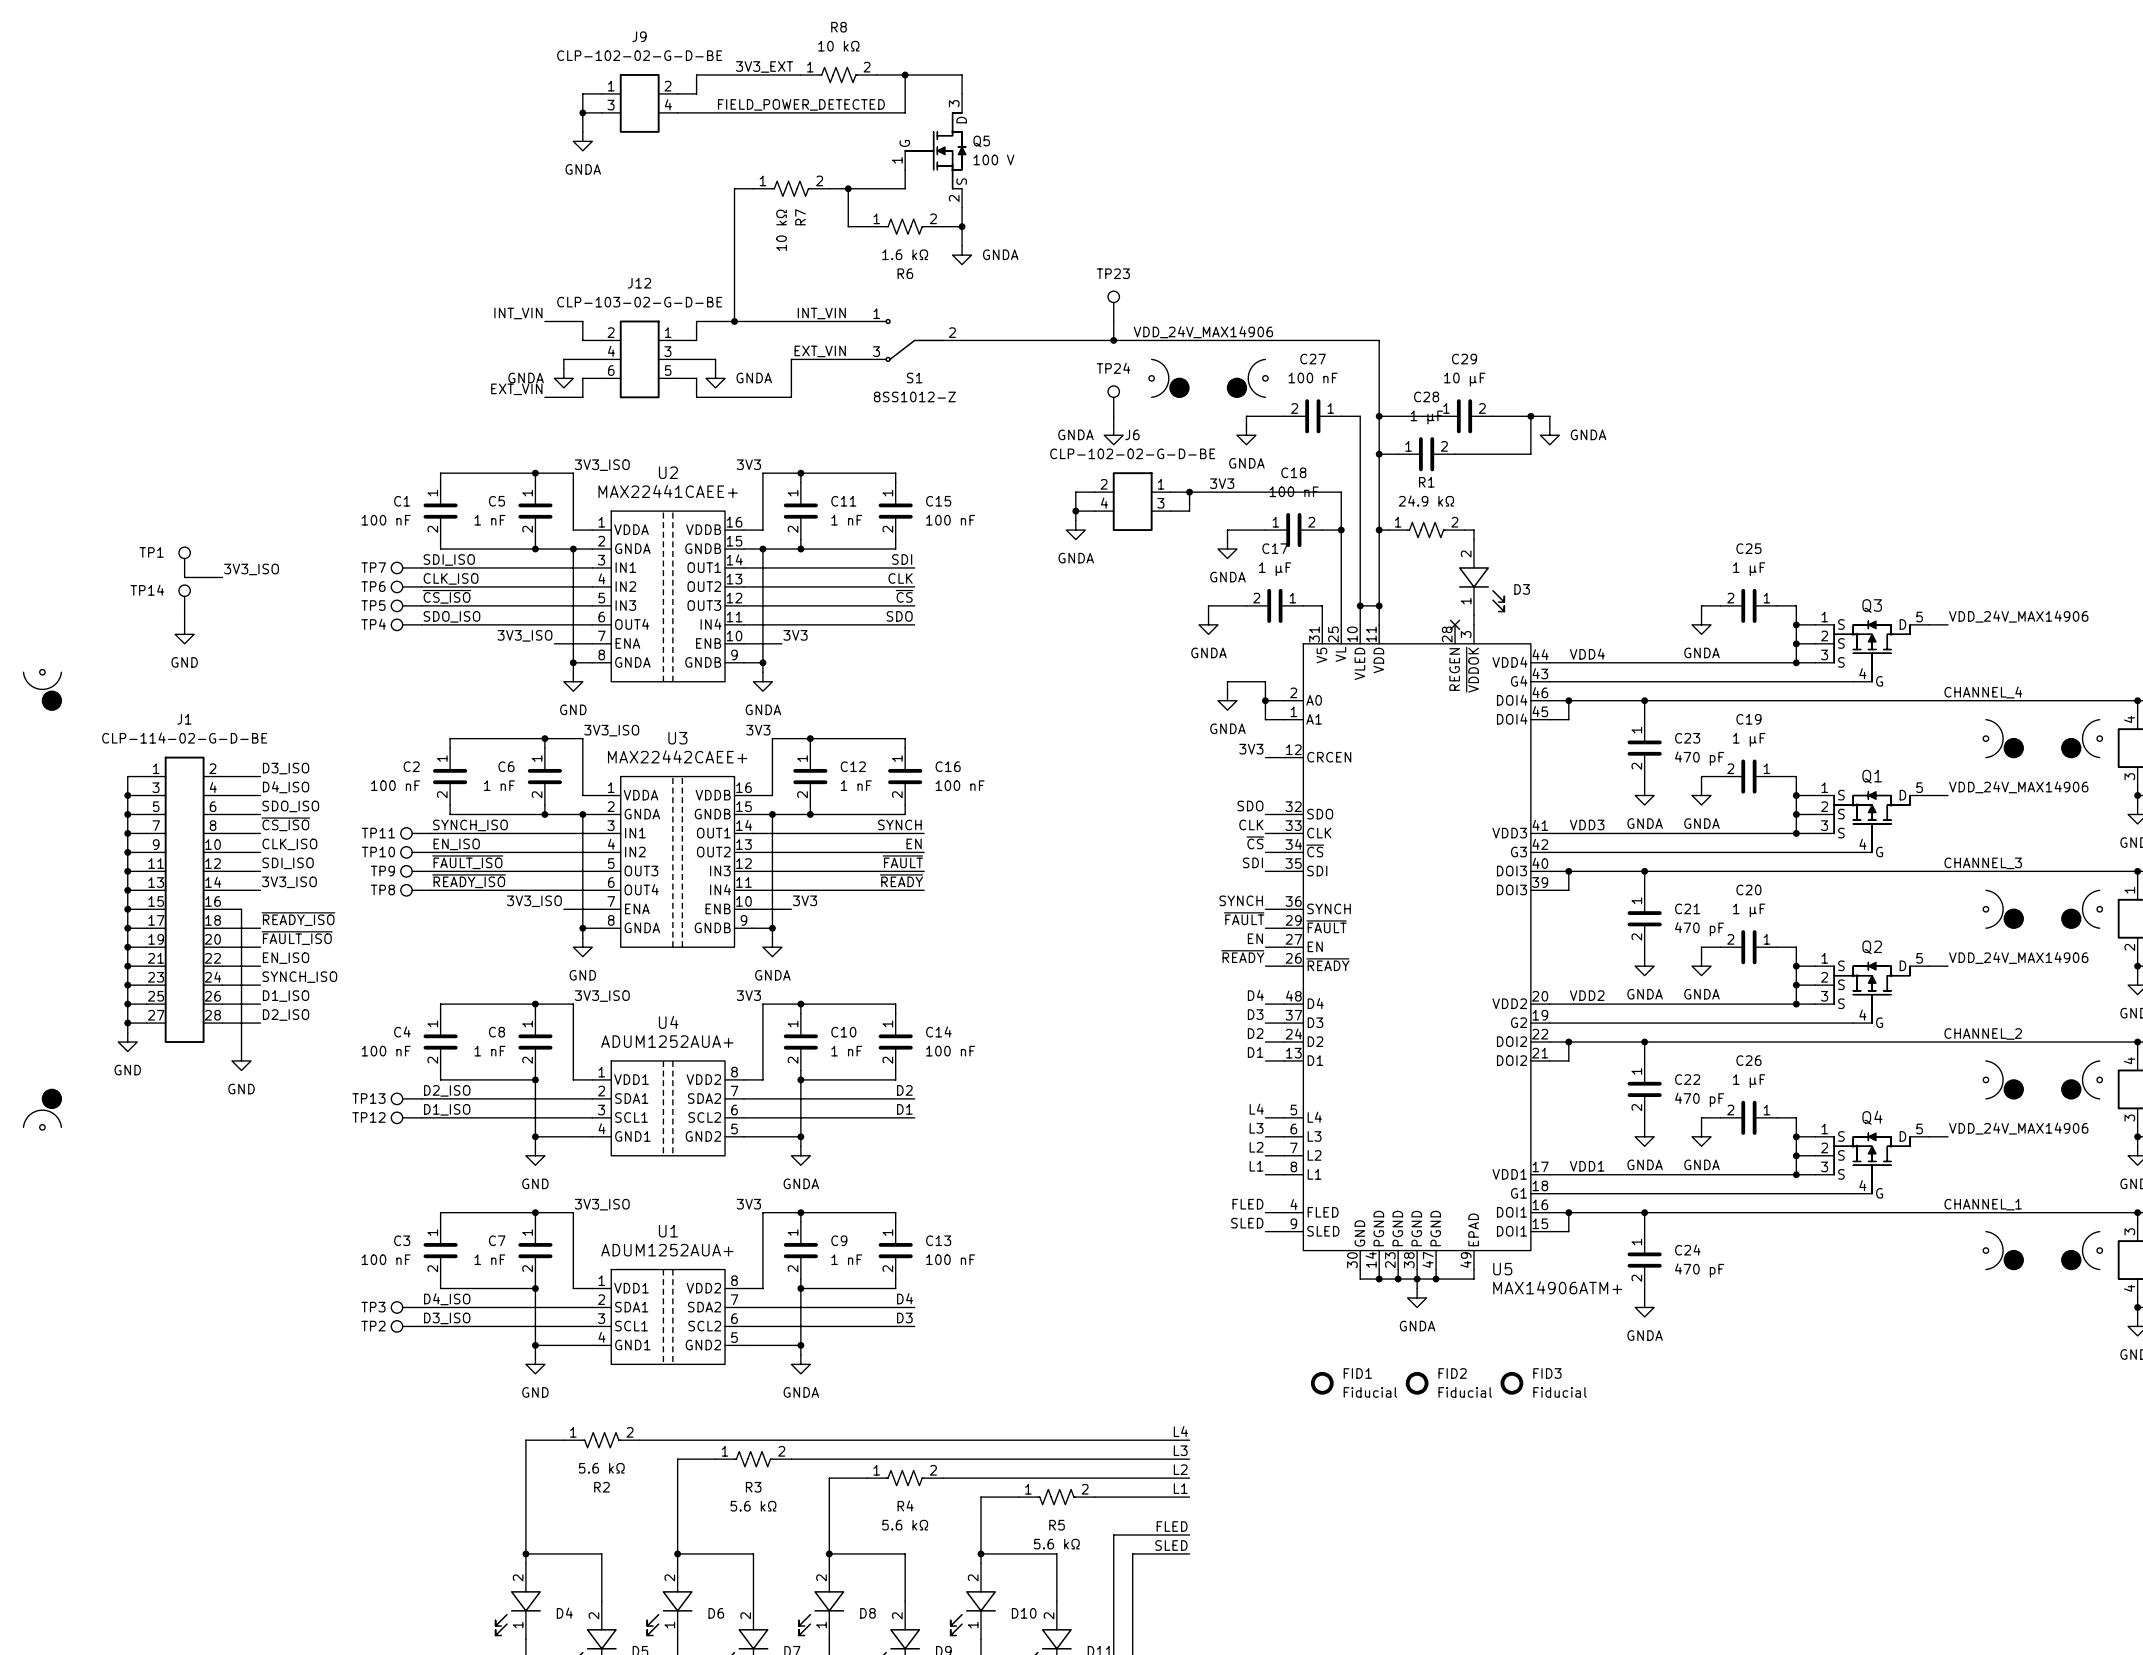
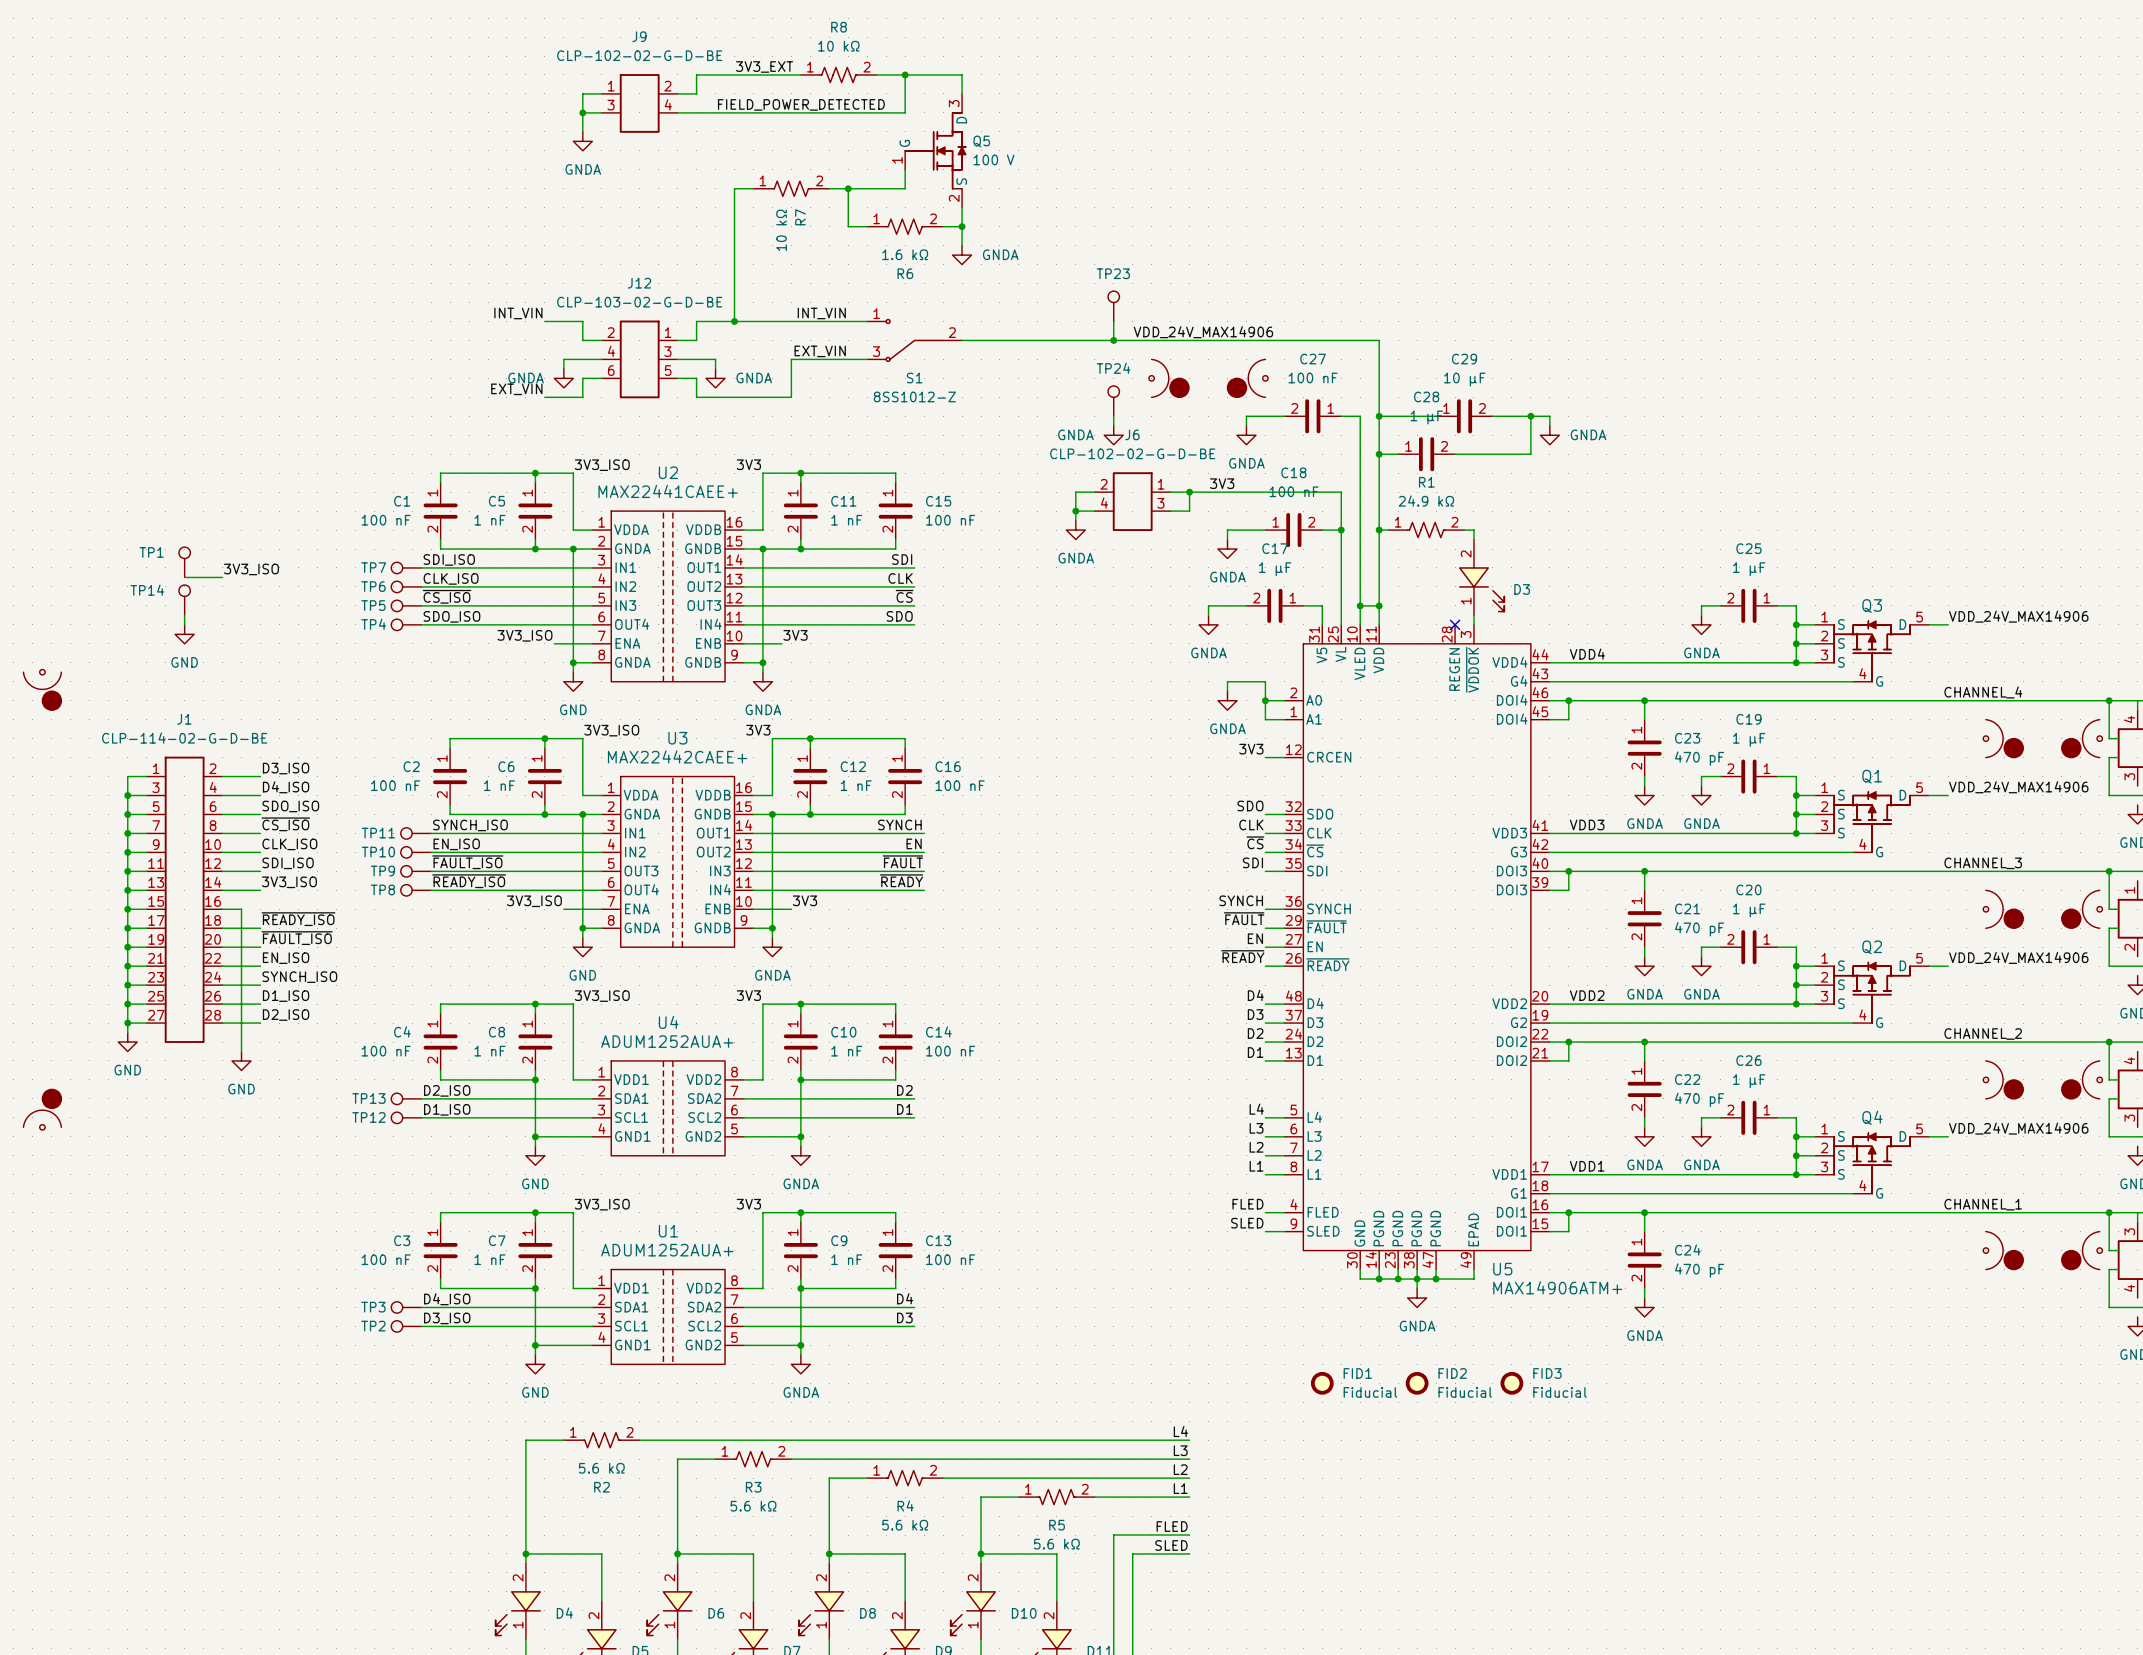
wire: none -> (2109, 700) (2109, 738) (2118, 738)
junction: none -> (2109, 700)
junction: (2137, 700) -> none
wire: none -> (2118, 757) (2109, 757) (2109, 795) (2137, 795)
wire: (2137, 786) (2137, 804) -> none
junction: (2137, 795) -> none
wire: none -> (2109, 871) (2109, 909) (2118, 909)
junction: none -> (2109, 871)
wire: (2137, 871) (2137, 880) -> none
junction: (2137, 871) -> none
wire: none -> (2118, 928) (2109, 928) (2109, 966) (2137, 966)
wire: (2137, 956) (2137, 975) -> none
junction: (2137, 966) -> none
wire: none -> (2109, 1042) (2109, 1079) (2118, 1079)
junction: none -> (2109, 1042)
wire: (2137, 1042) (2137, 1051) -> none
junction: (2137, 1042) -> none
wire: none -> (2118, 1098) (2109, 1098) (2109, 1136) (2137, 1136)
wire: (2137, 1127) (2137, 1146) -> none
junction: (2137, 1136) -> none
wire: none -> (2109, 1212) (2109, 1250) (2118, 1250)
junction: none -> (2109, 1212)
junction: (2137, 1212) -> none
wire: none -> (2118, 1269) (2109, 1269) (2109, 1307) (2137, 1307)
wire: (2137, 1297) (2137, 1316) -> none
junction: (2137, 1307) -> none

